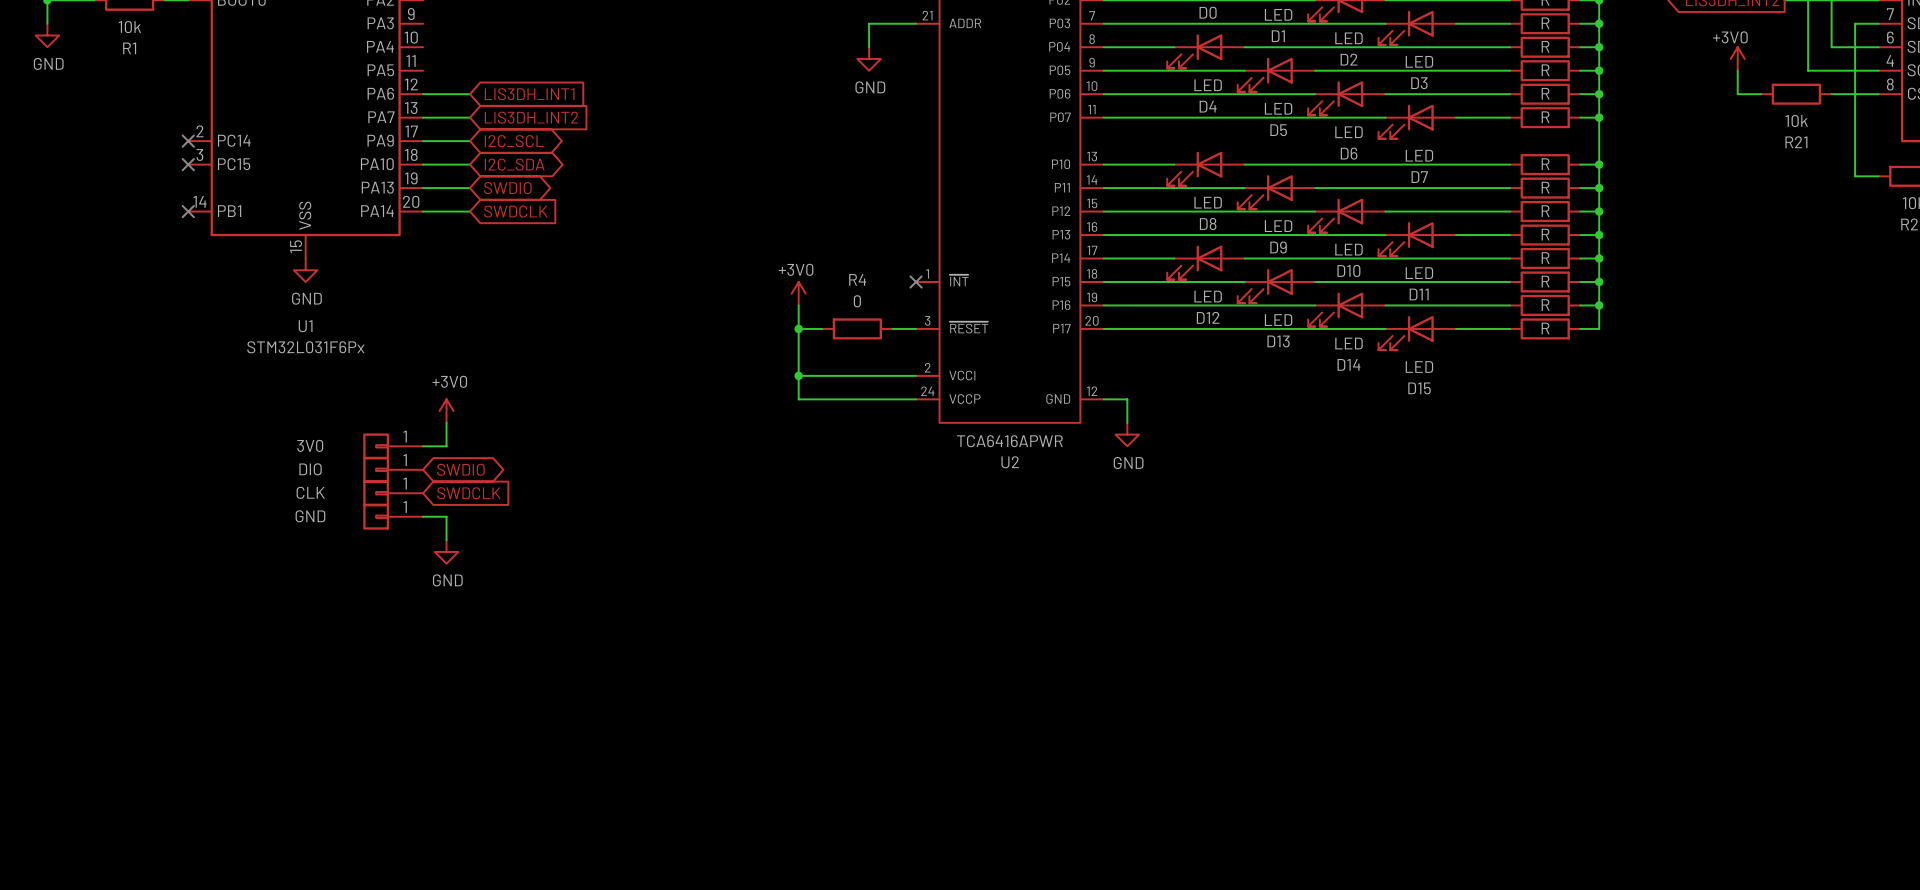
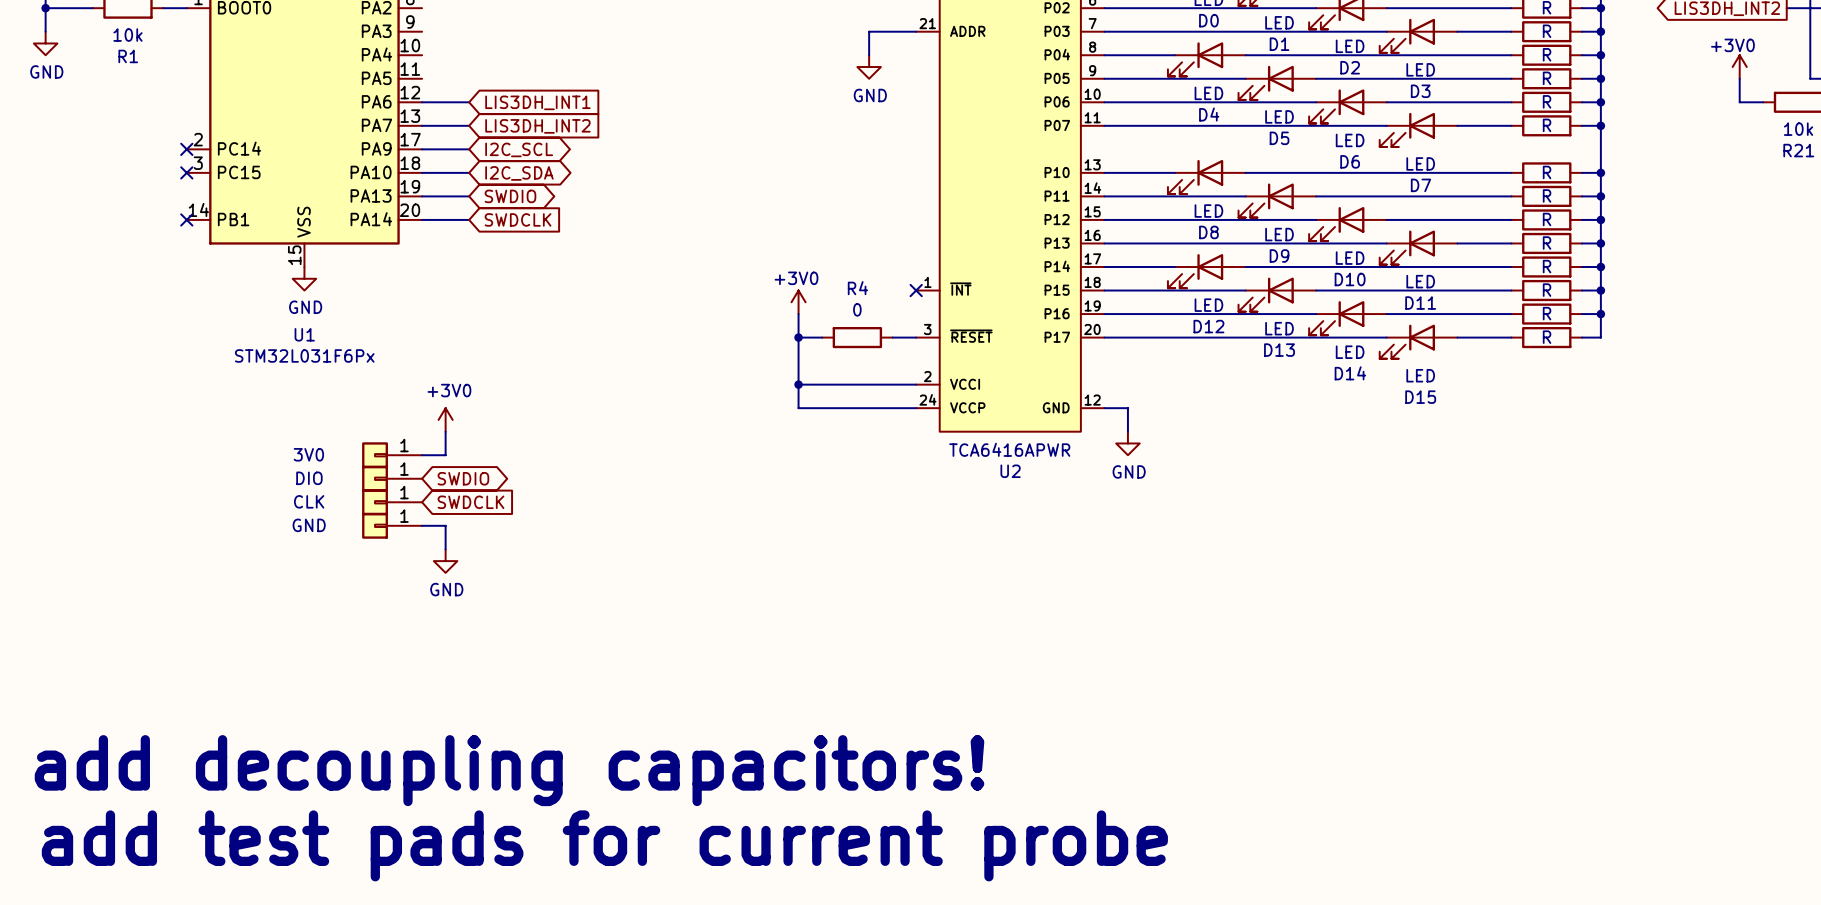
text: none -> add decoupling capacitors! (509, 770)
text: none -> add test pads for current probe (604, 845)

